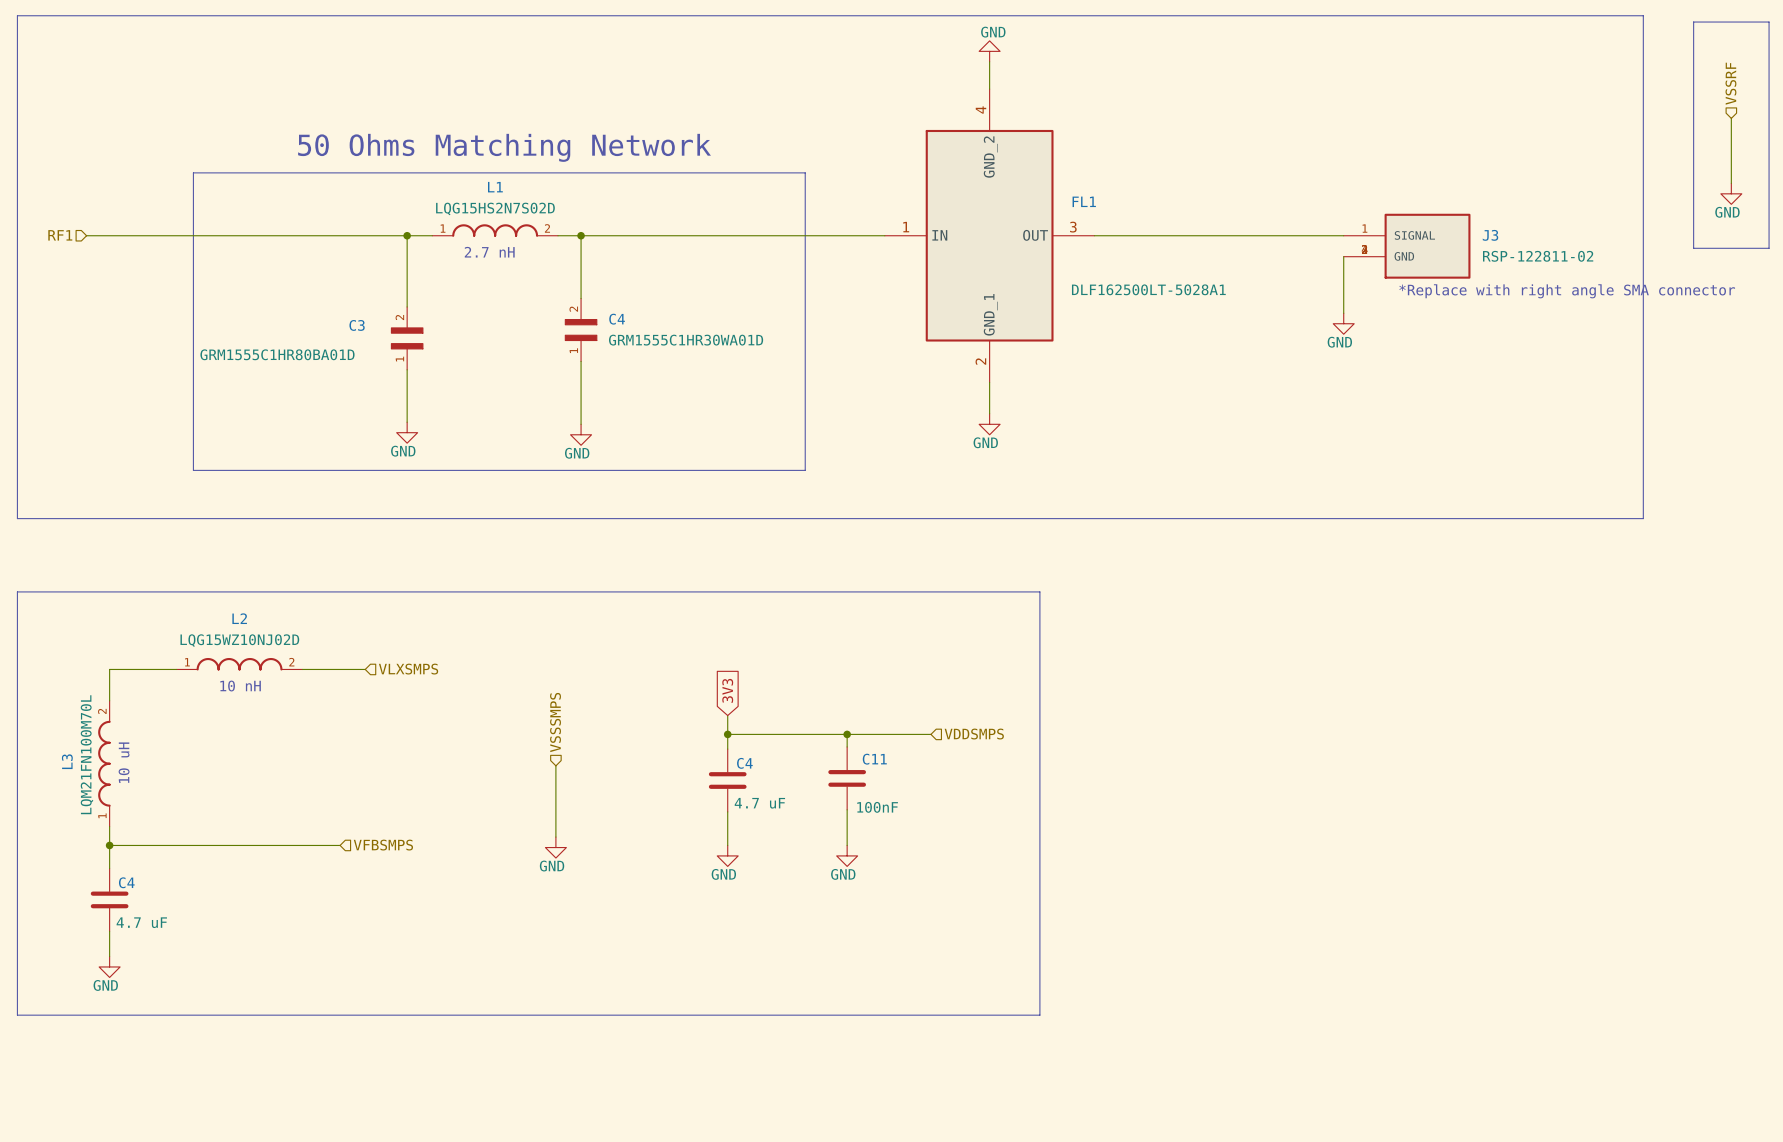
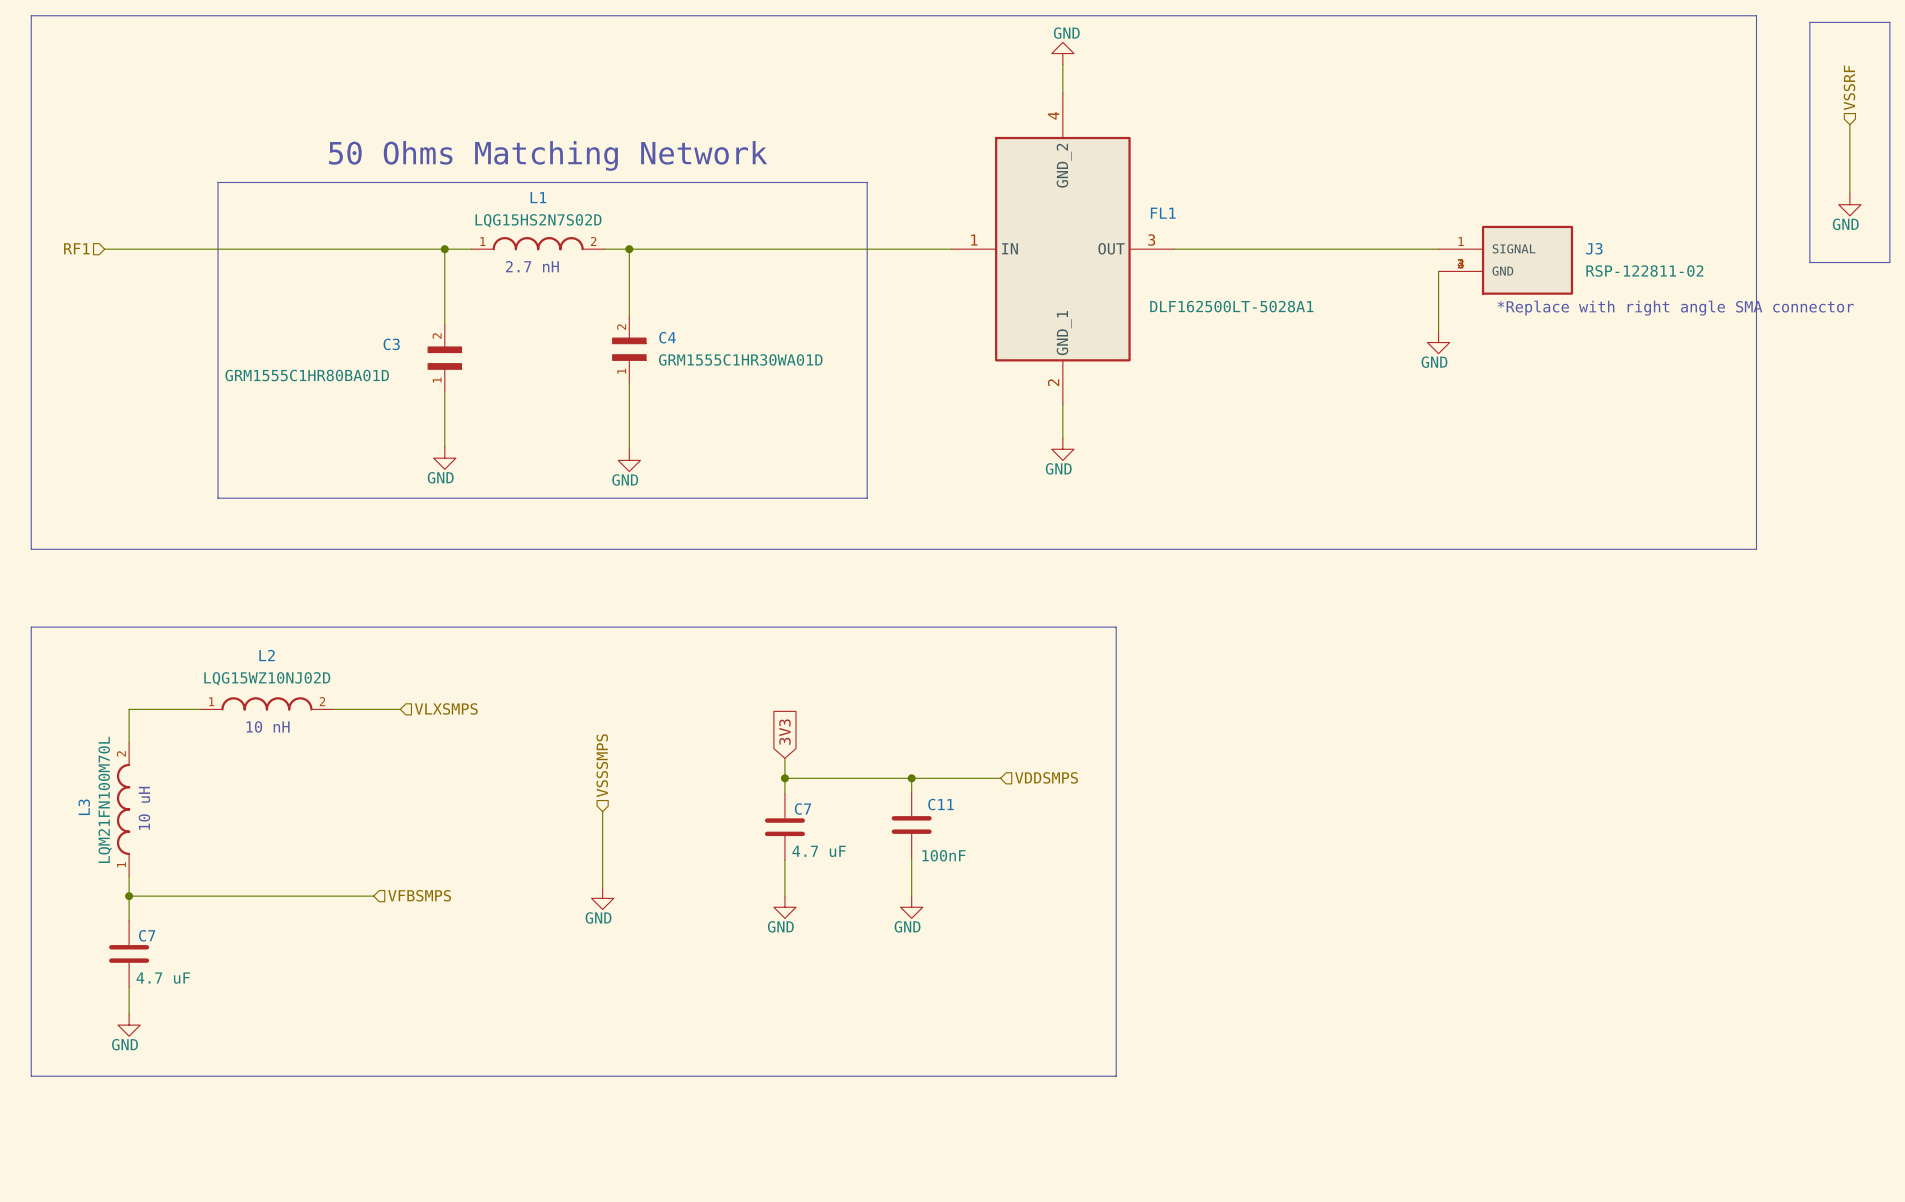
C4 name: C4 (744, 763) -> C7 (802, 809)
C4 name: C4 (126, 882) -> C7 (147, 935)

